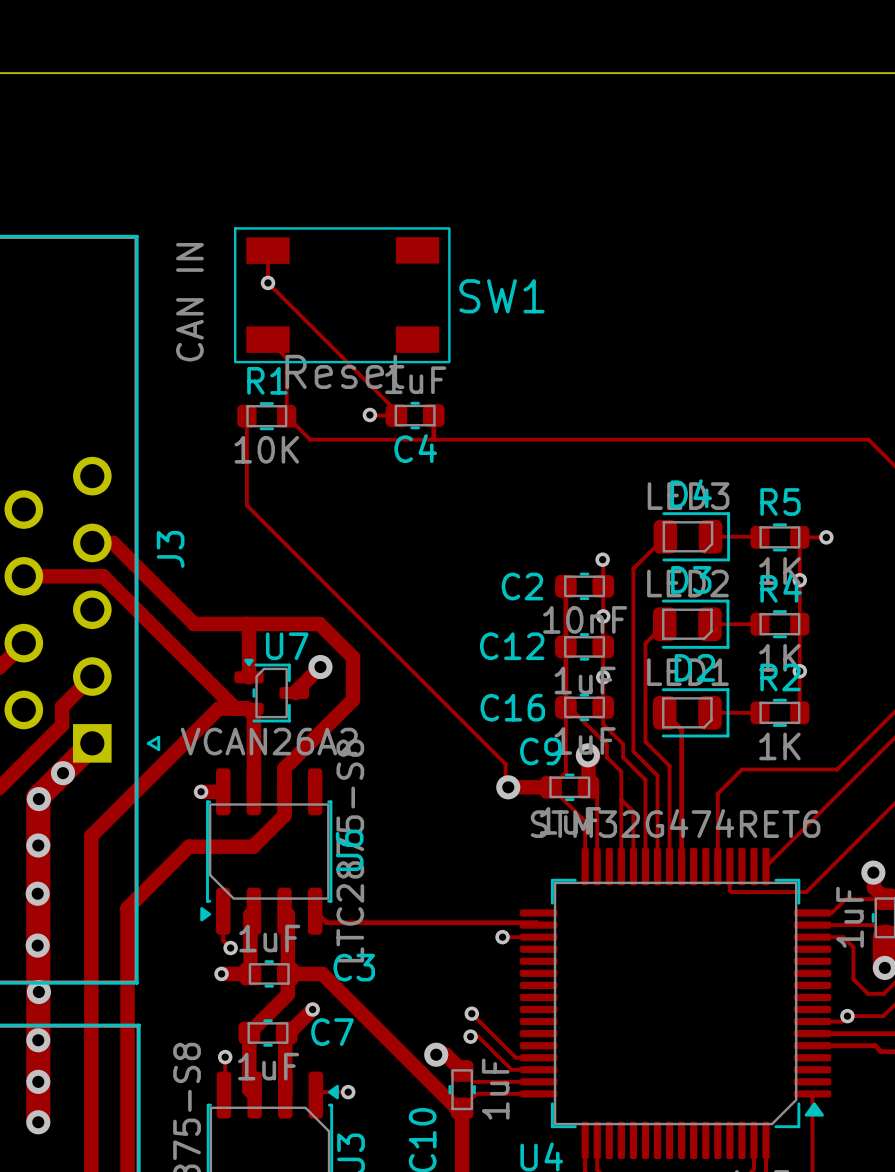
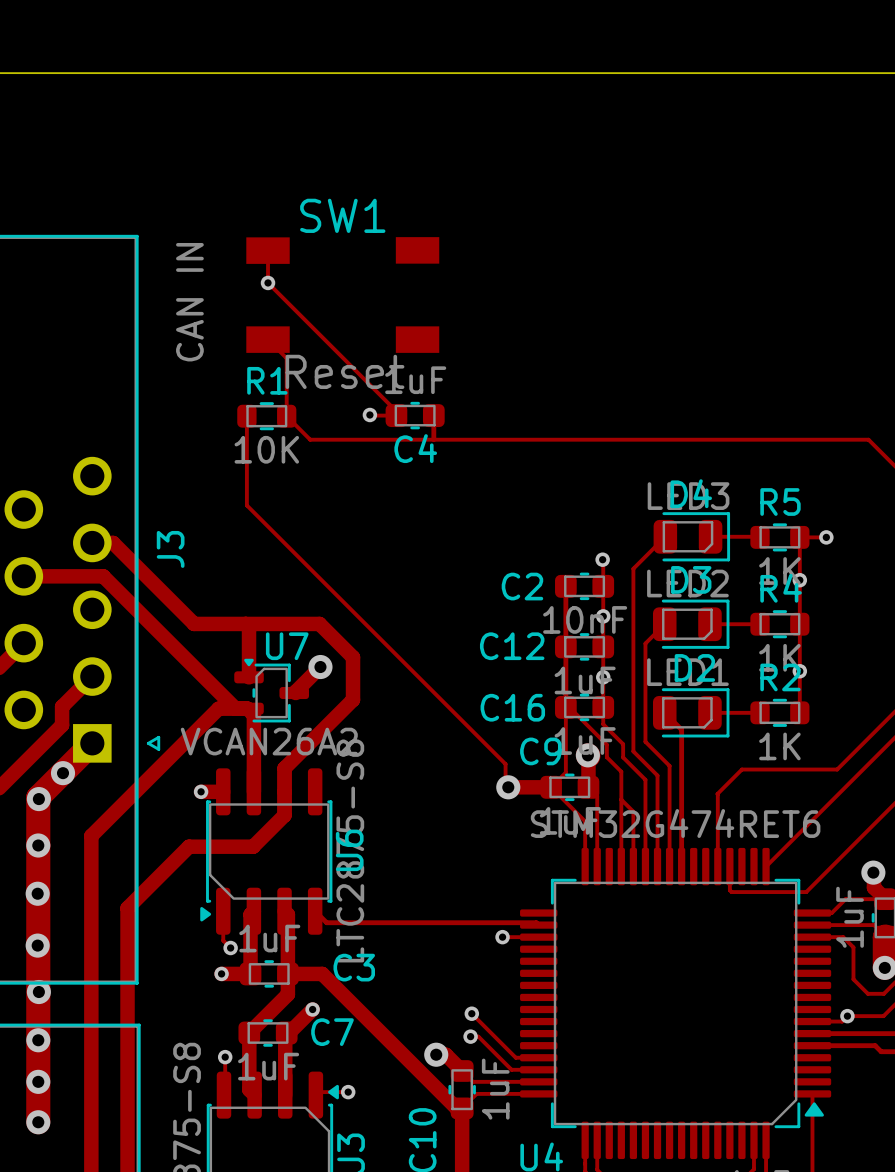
SW1 footprint: [234, 227, 451, 364] -> [246, 237, 440, 353]
SW1 name position: SW1 (501, 296) -> SW1 (342, 215)

